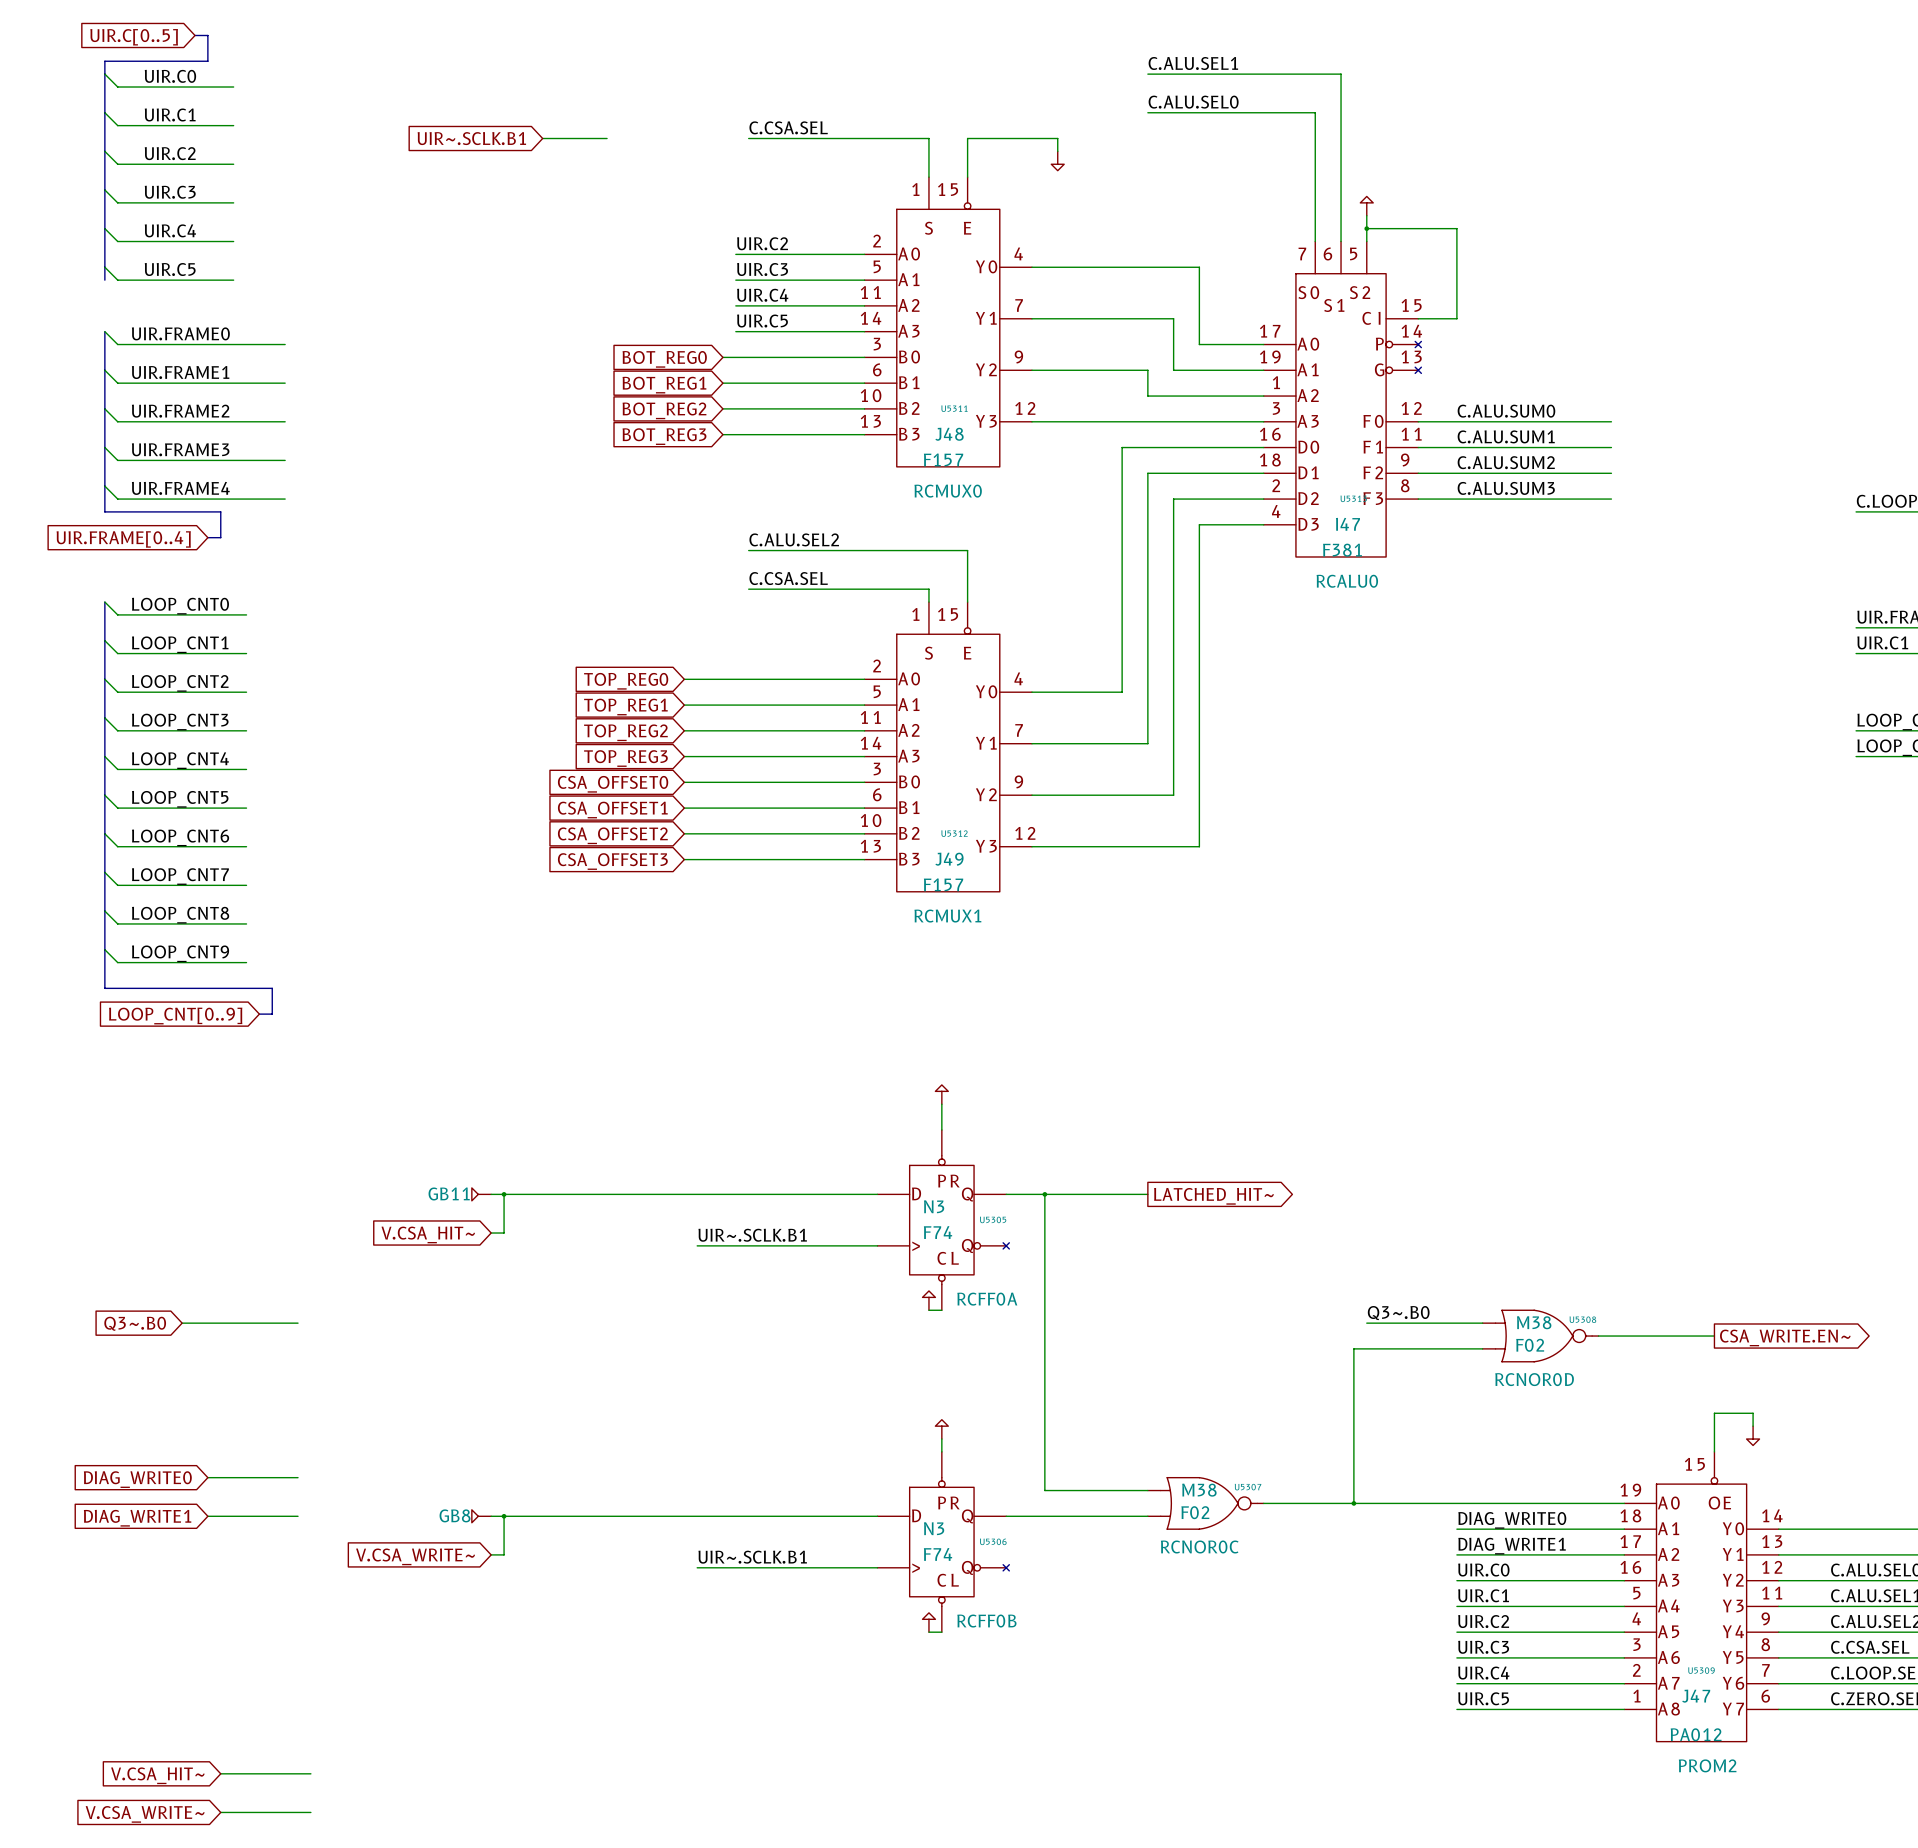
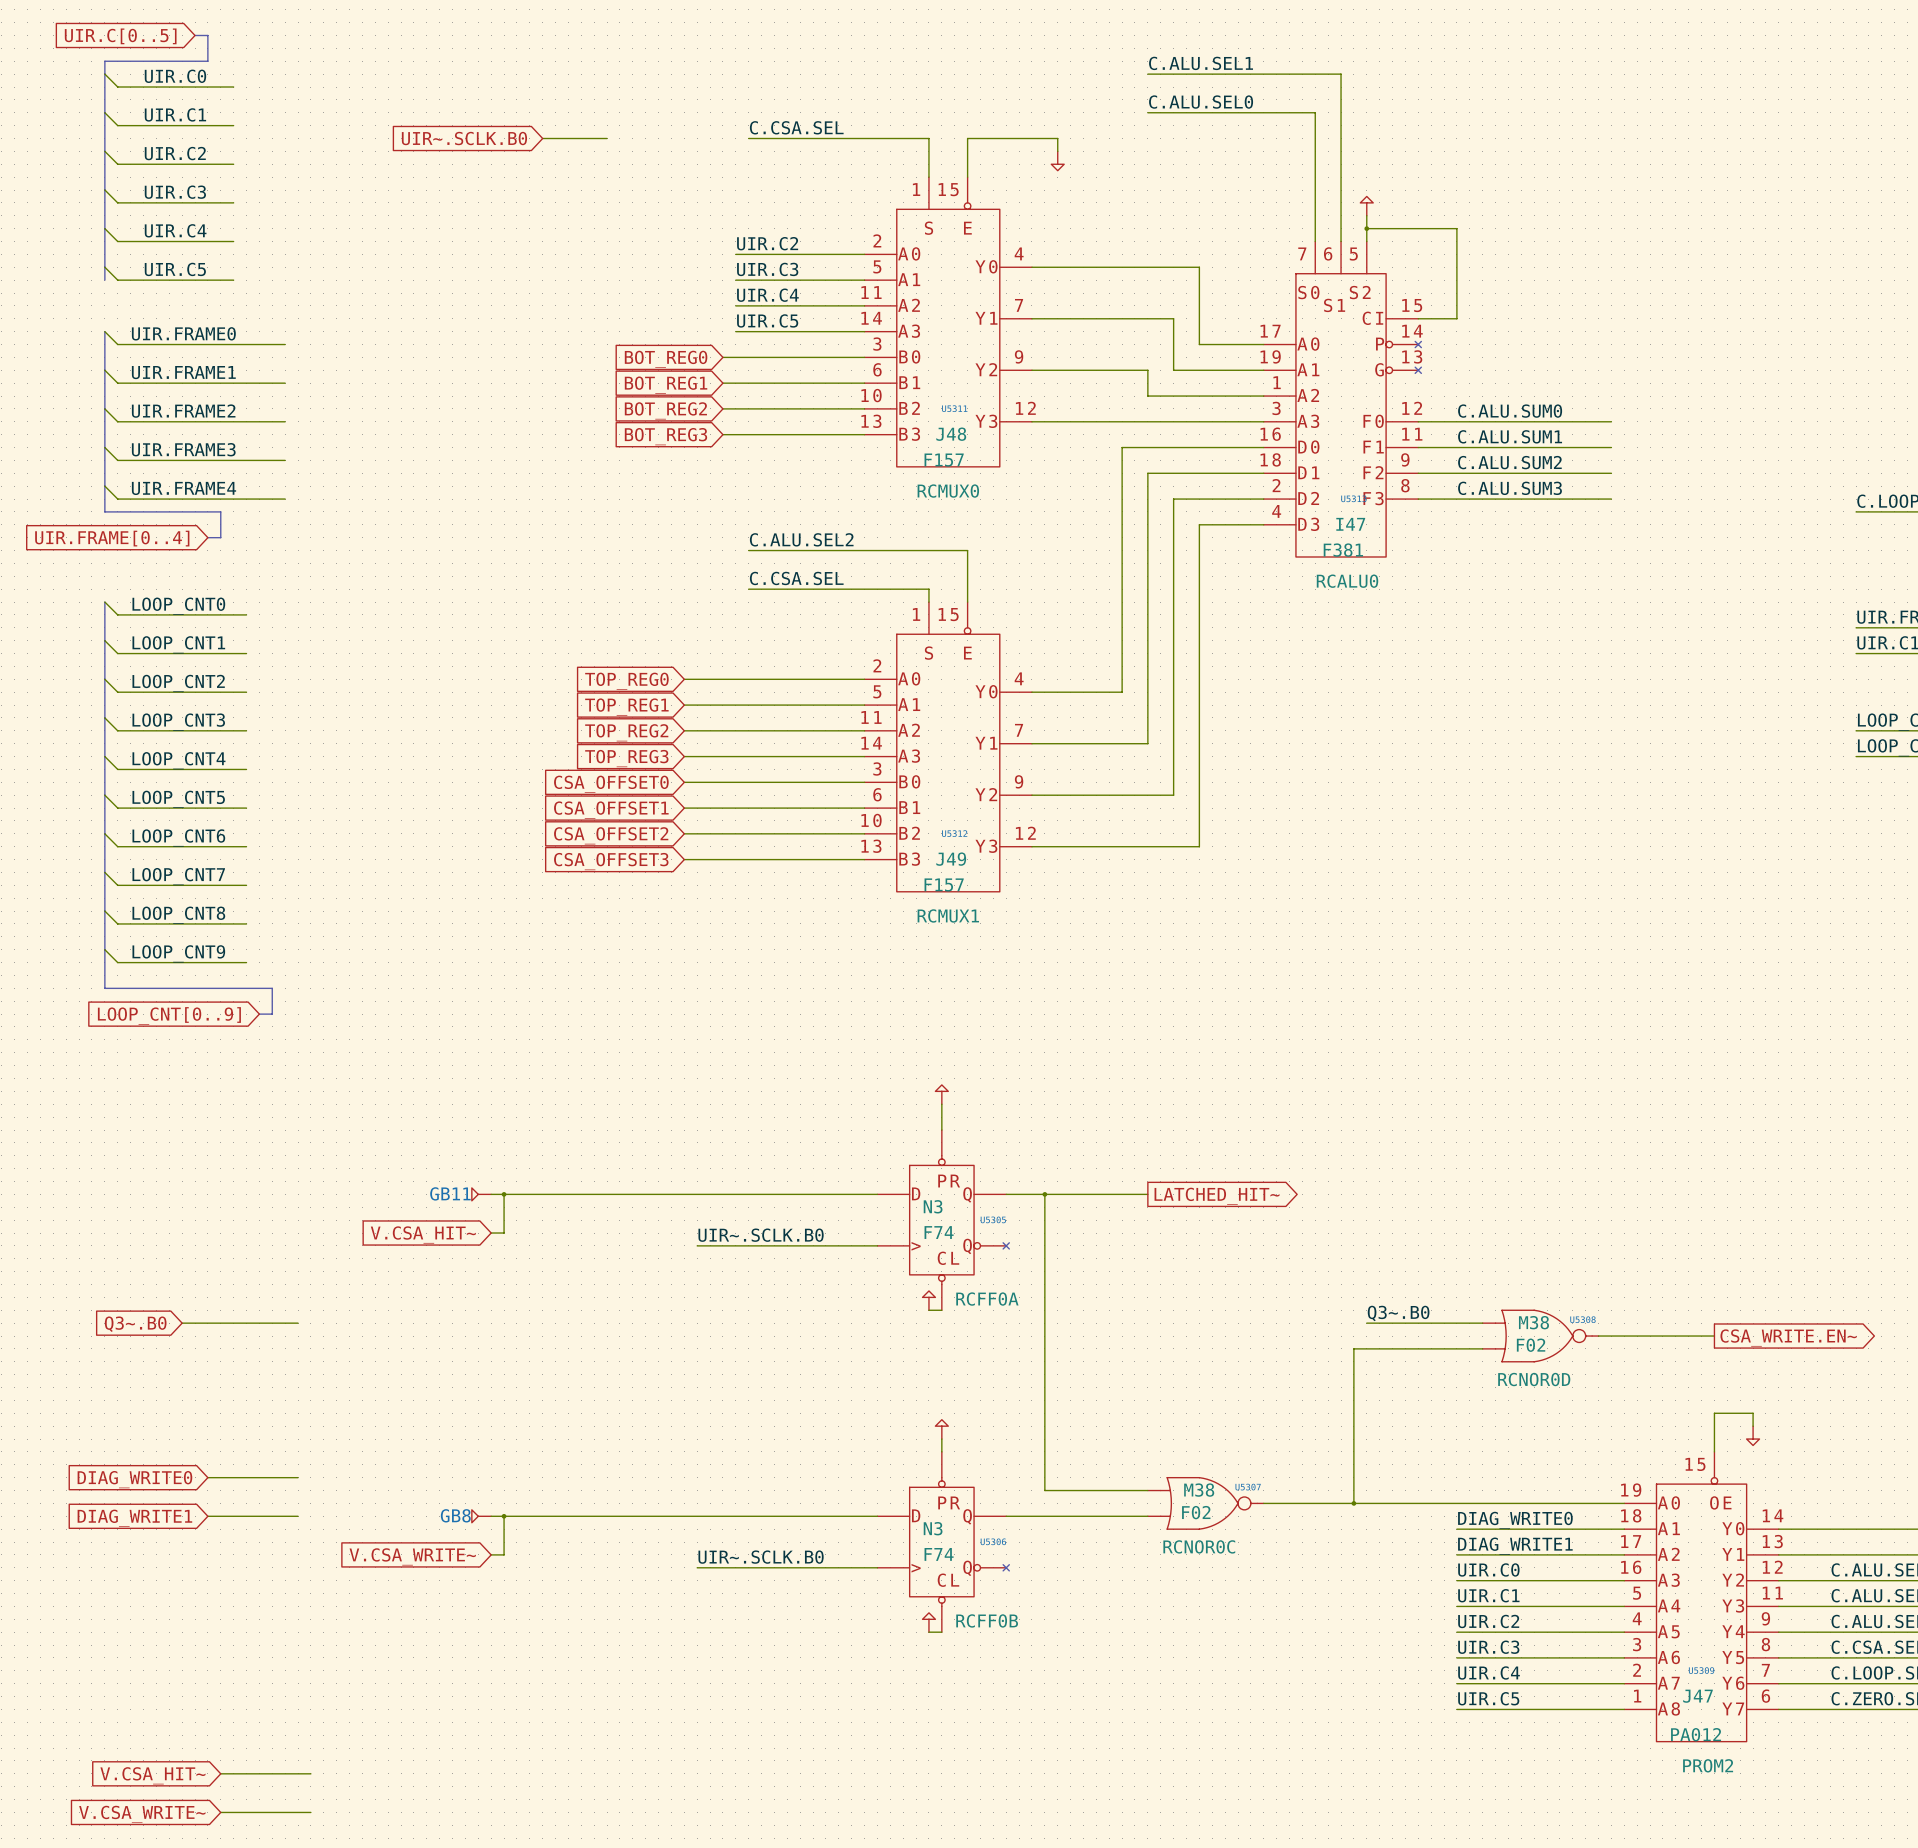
global label: UIR~.SCLK.B1 (471, 138) -> UIR~.SCLK.B0 (464, 138)
label: UIR~.SCLK.B1 (752, 1235) -> UIR~.SCLK.B0 (761, 1235)
label: UIR~.SCLK.B1 (752, 1557) -> UIR~.SCLK.B0 (761, 1557)

